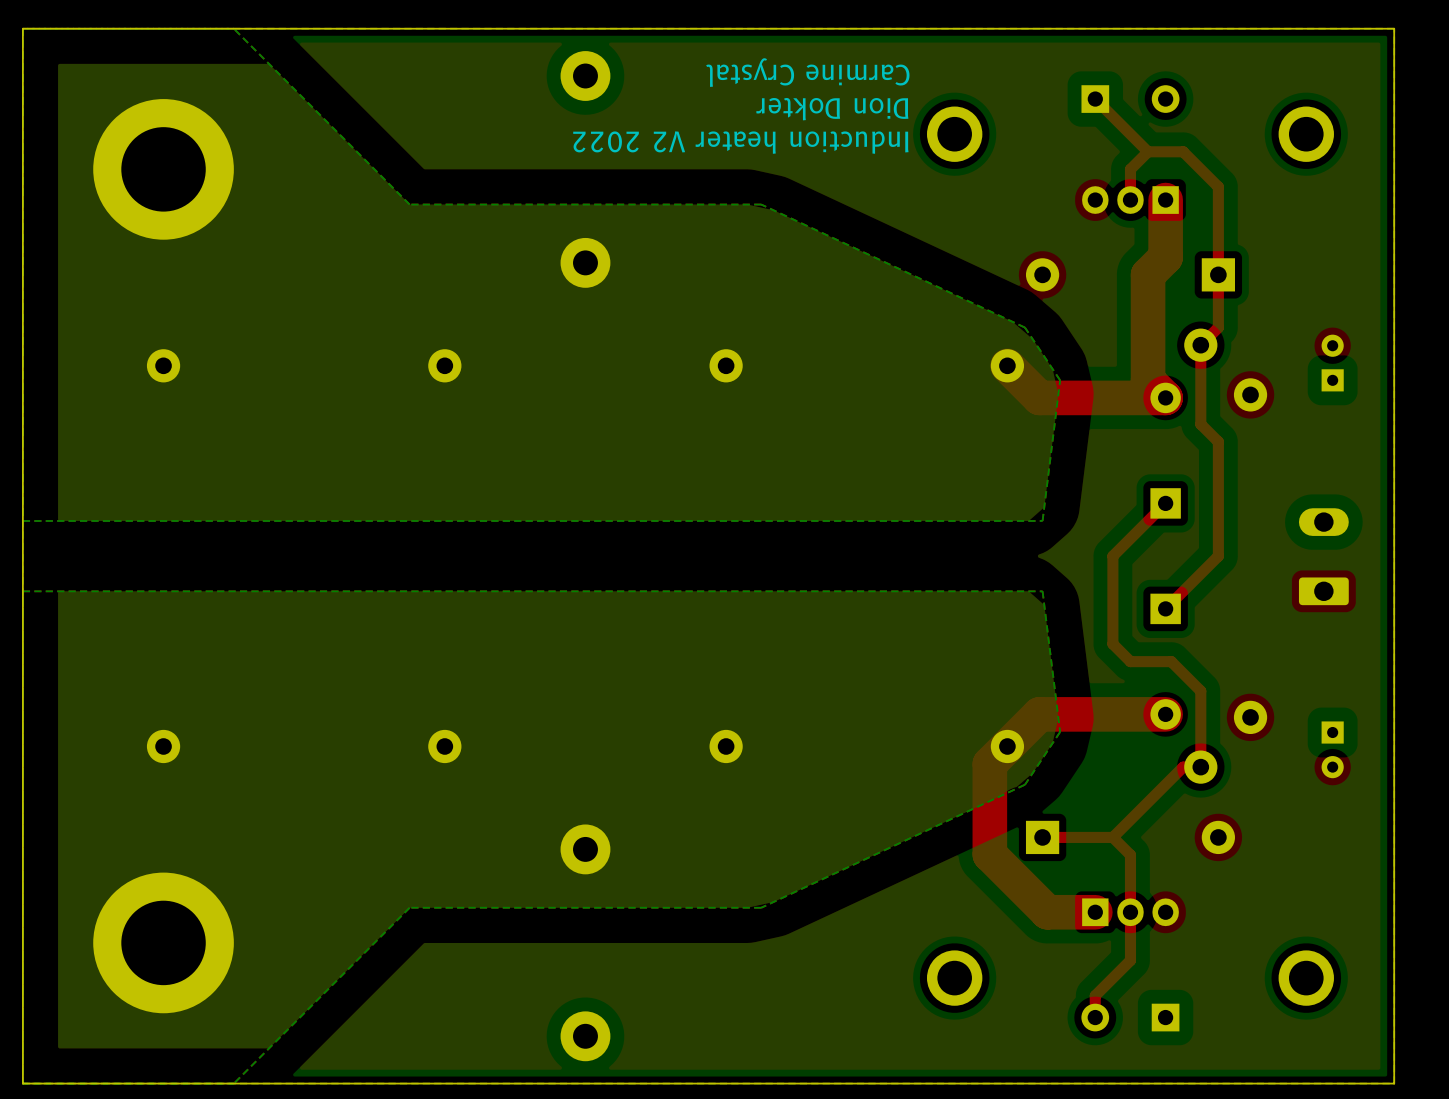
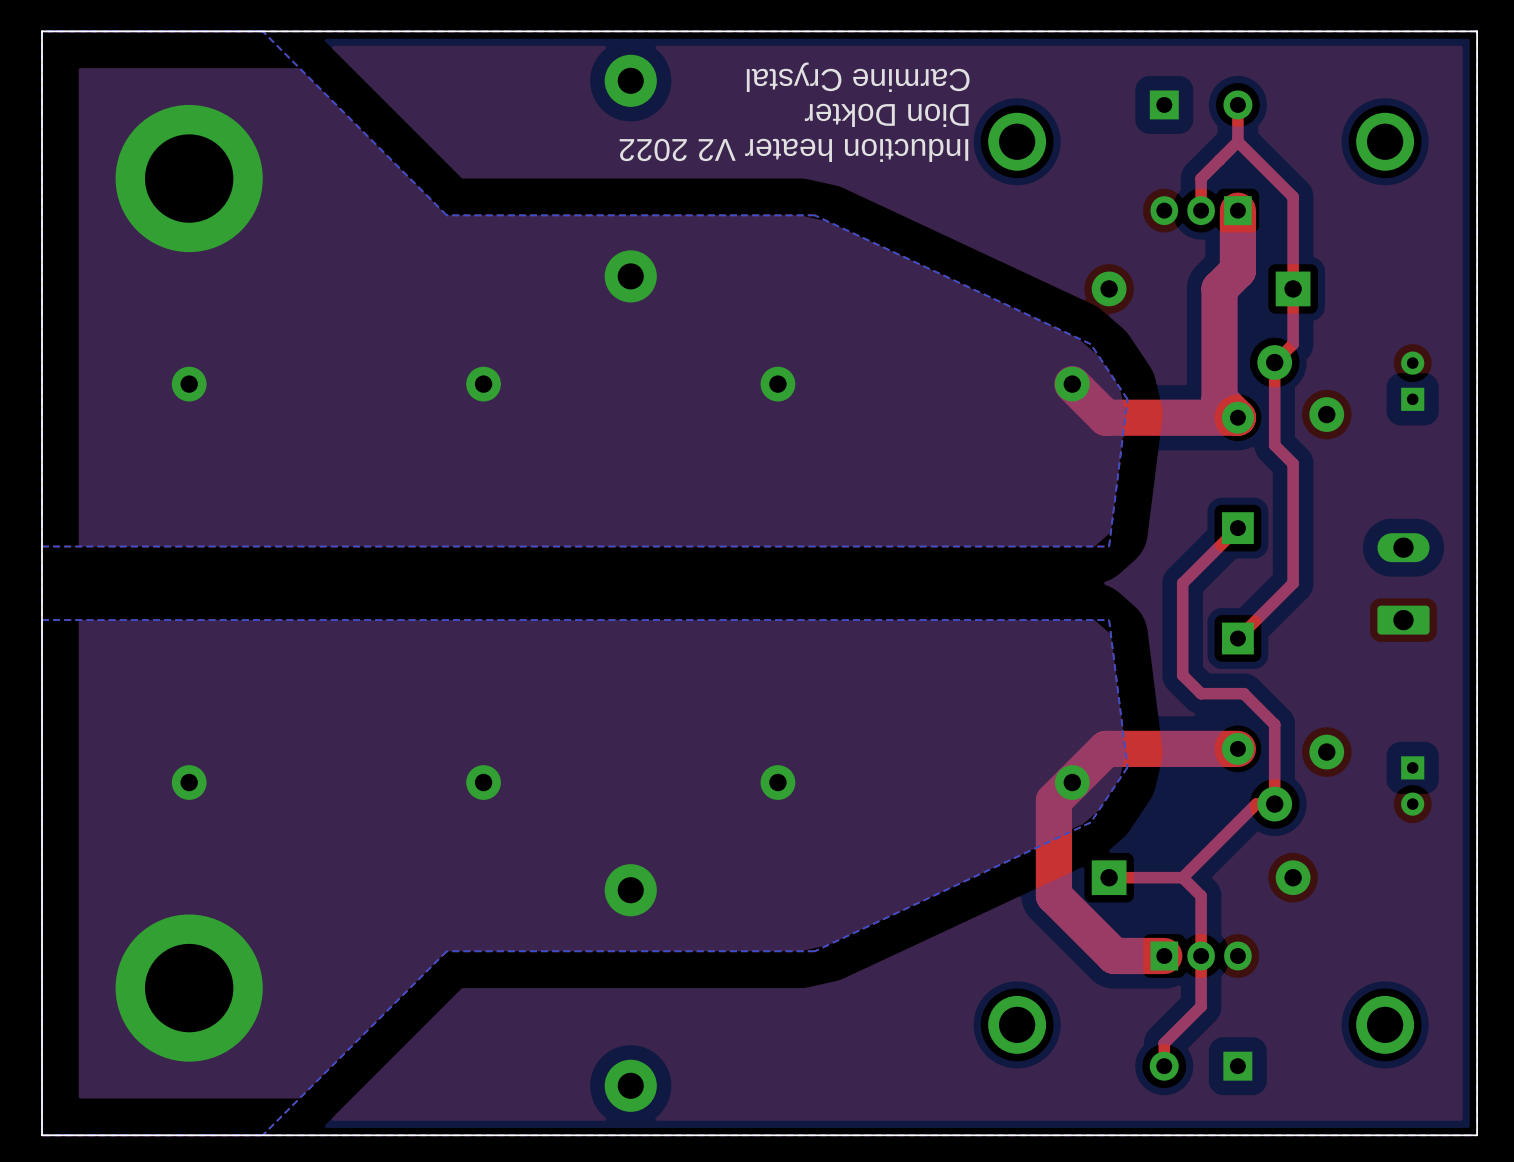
top track: (1095, 99) (1147, 151) (1183, 151) -> (1237, 141) (1256, 160)
top track: none -> (1237, 104) (1237, 141)
top track: none -> (1237, 141) (1219, 160)

